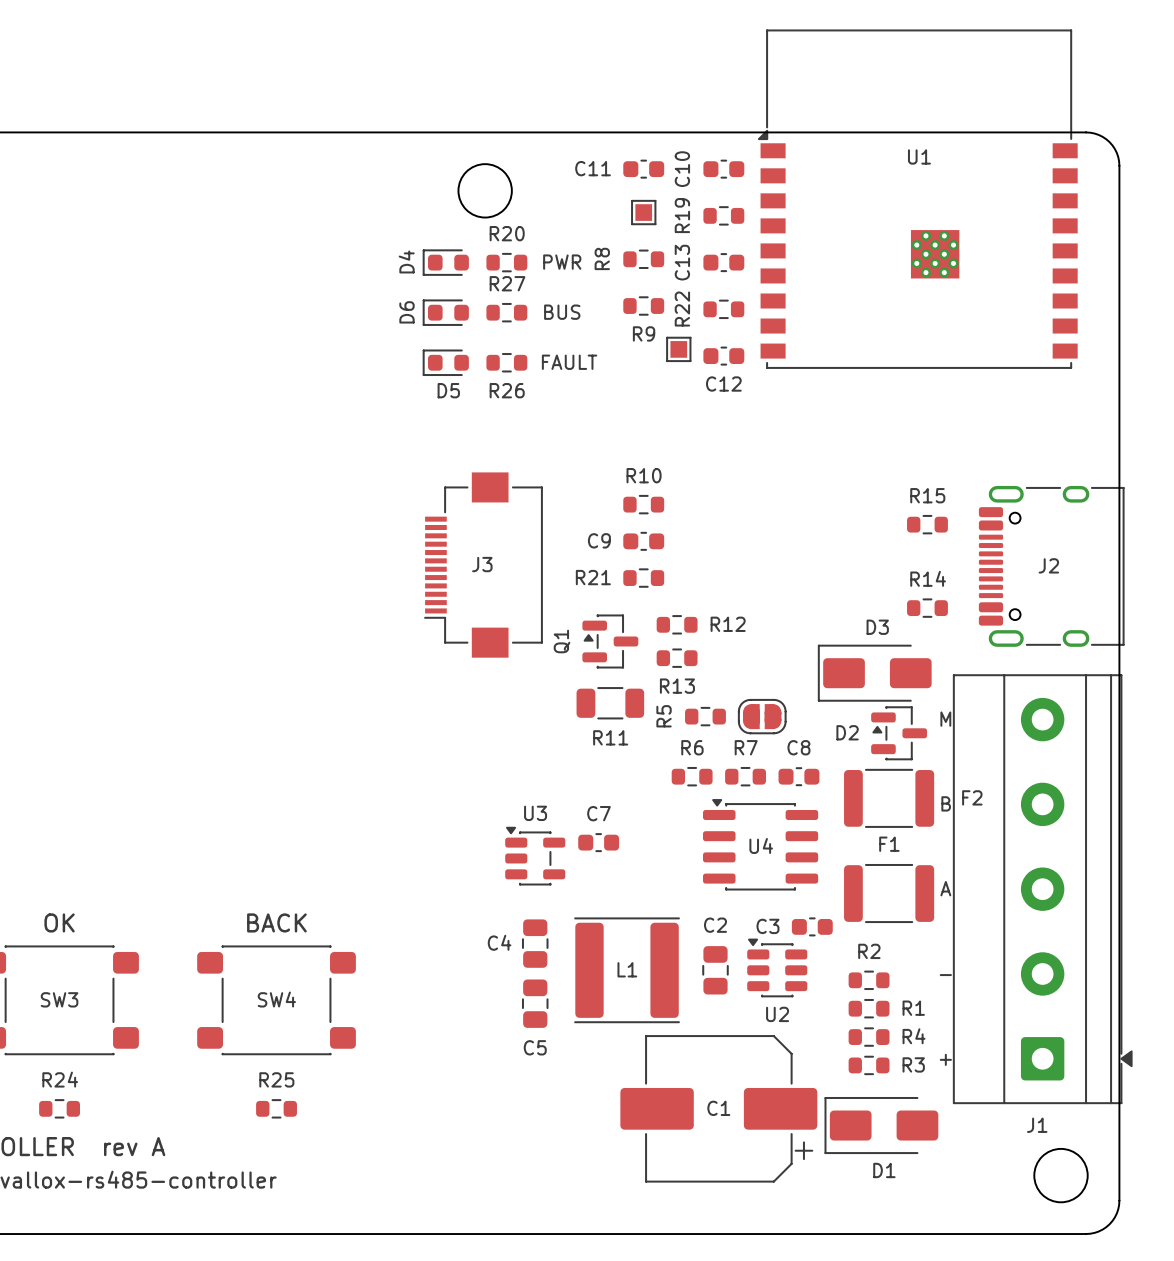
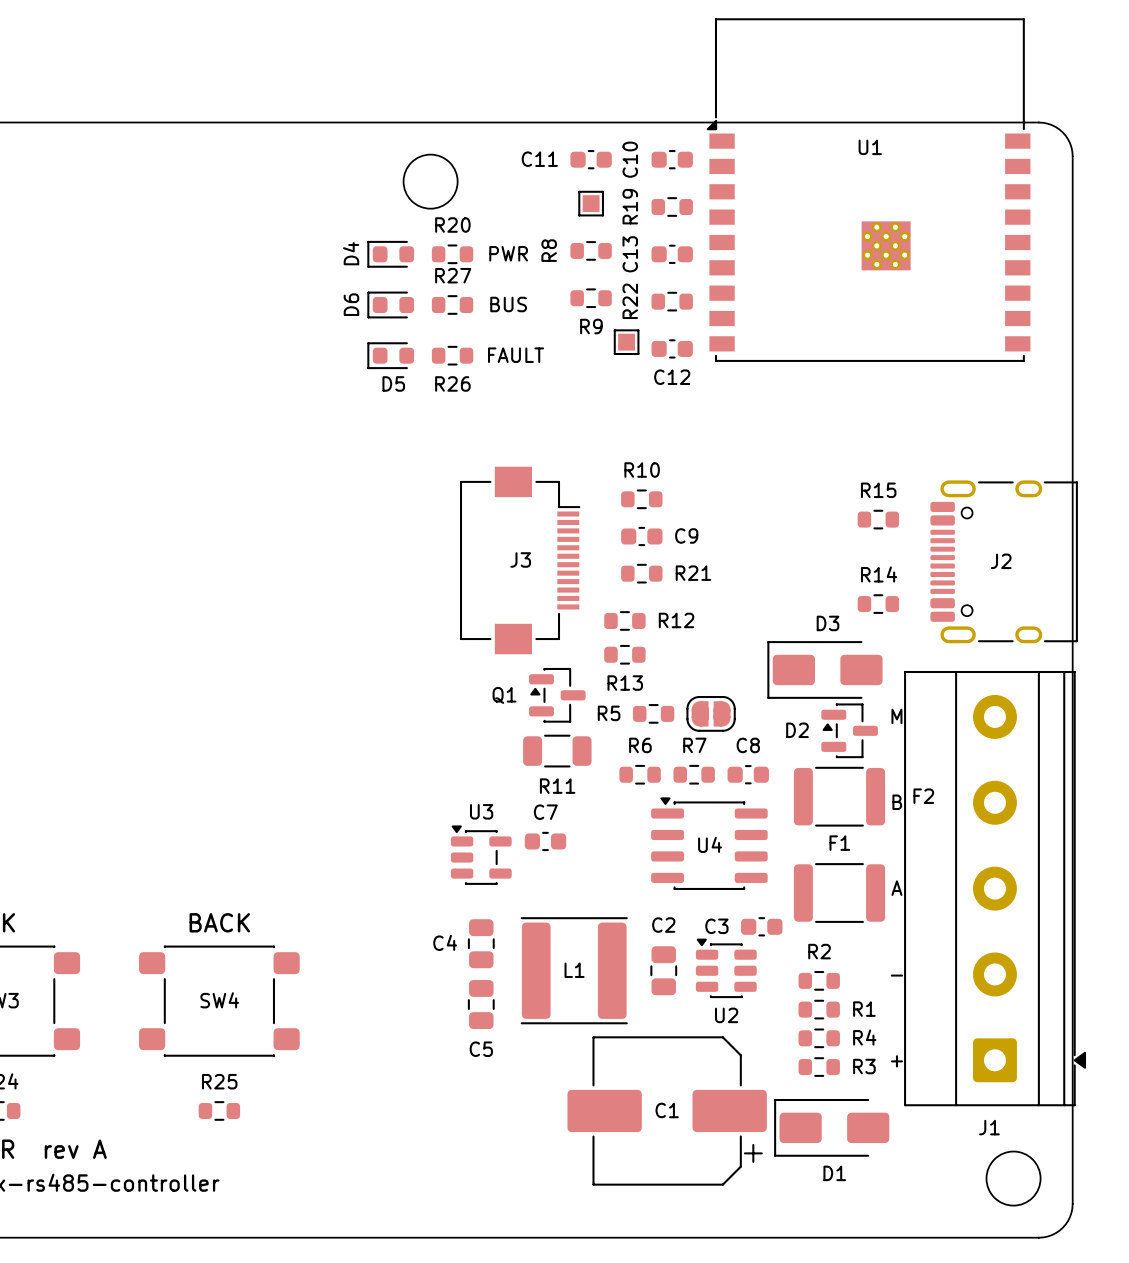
R10 position: (643, 504) -> (641, 499)
C9 name position: C9 (599, 540) -> C9 (686, 535)
C9 position: (643, 541) -> (641, 536)
J3 rotation: 0° (483, 565) -> 180° (520, 560)
R21 name position: R21 (593, 577) -> R21 (693, 573)
R21 position: (643, 578) -> (641, 573)
Q1 name rotation: 0° (562, 641) -> 90° clockwise (504, 695)
Q1 position: (610, 641) -> (557, 695)
R11 position: (610, 703) -> (557, 751)
R5 name rotation: 0° (664, 716) -> 90° clockwise (609, 713)

